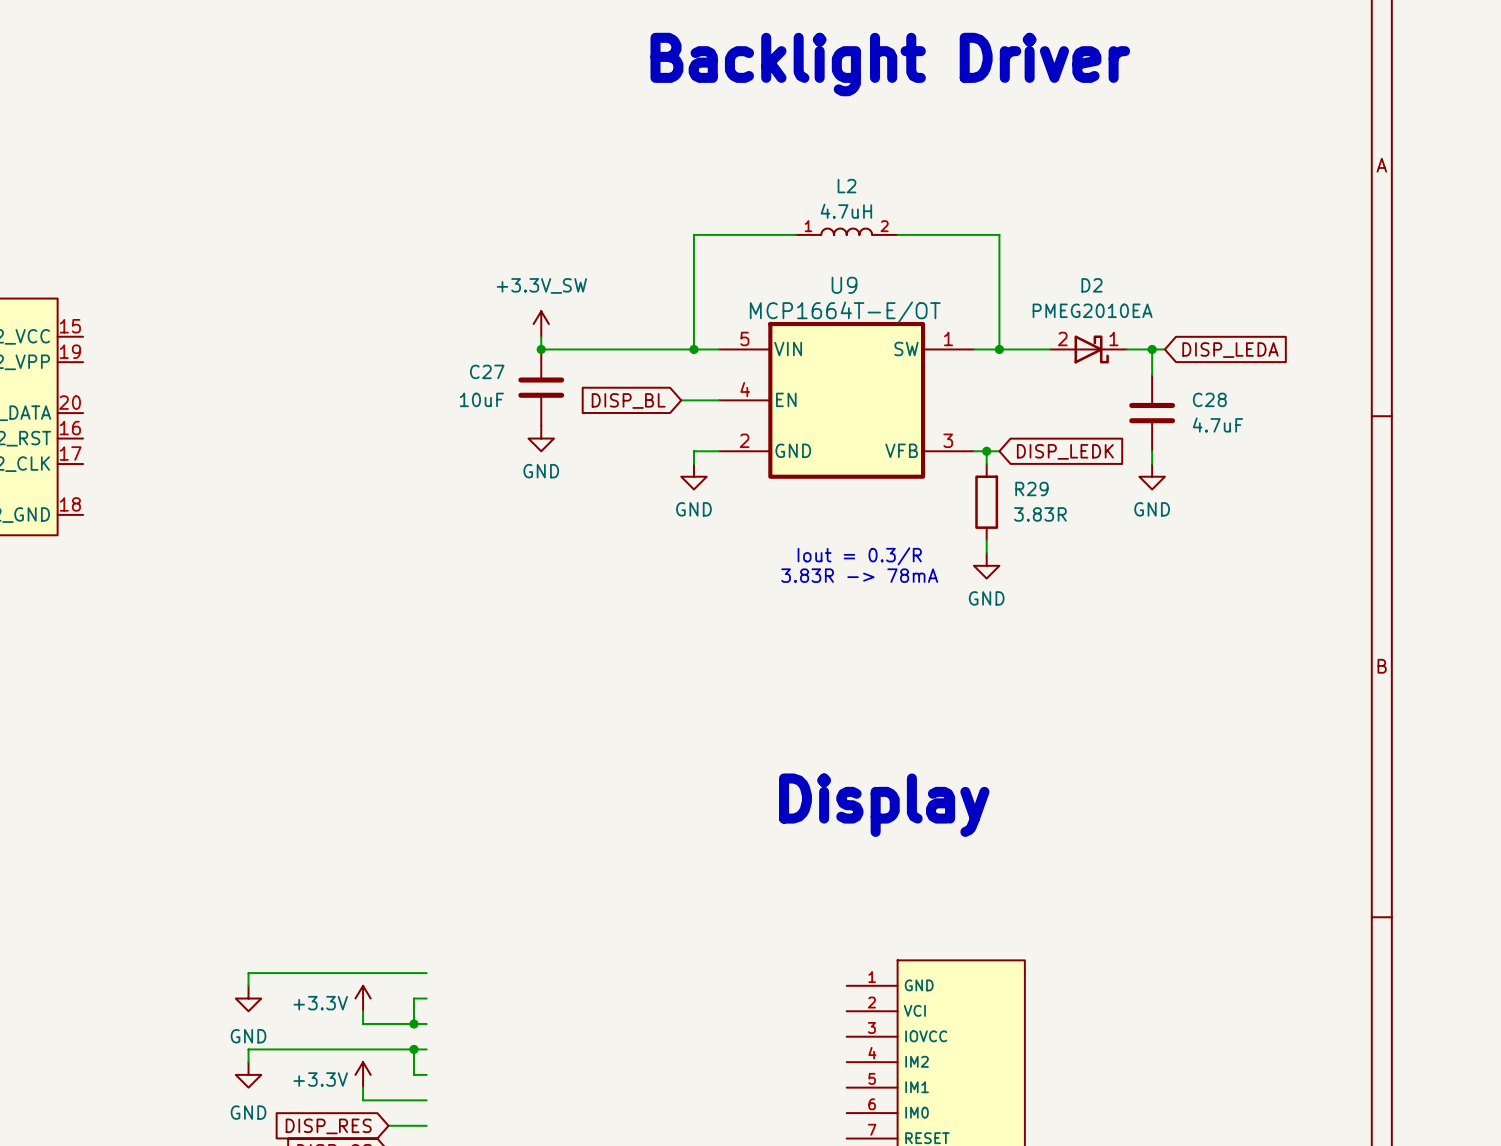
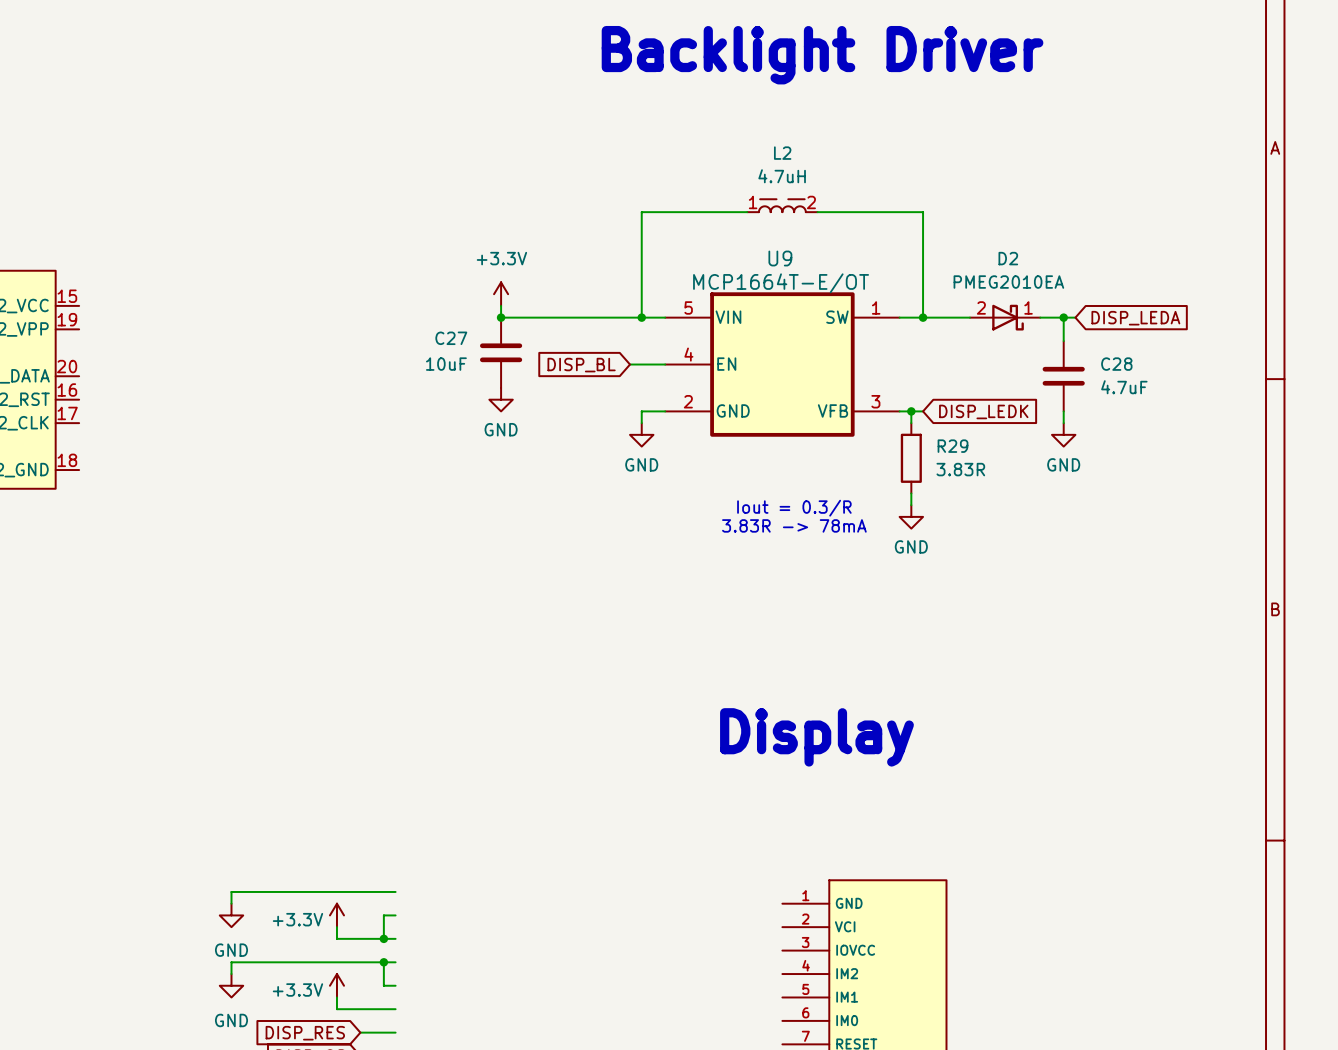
L2 symbol: [795, 228, 898, 235] -> [747, 198, 818, 213]
power symbol: +3.3V_SW (541, 324) -> +3.3V (501, 294)

